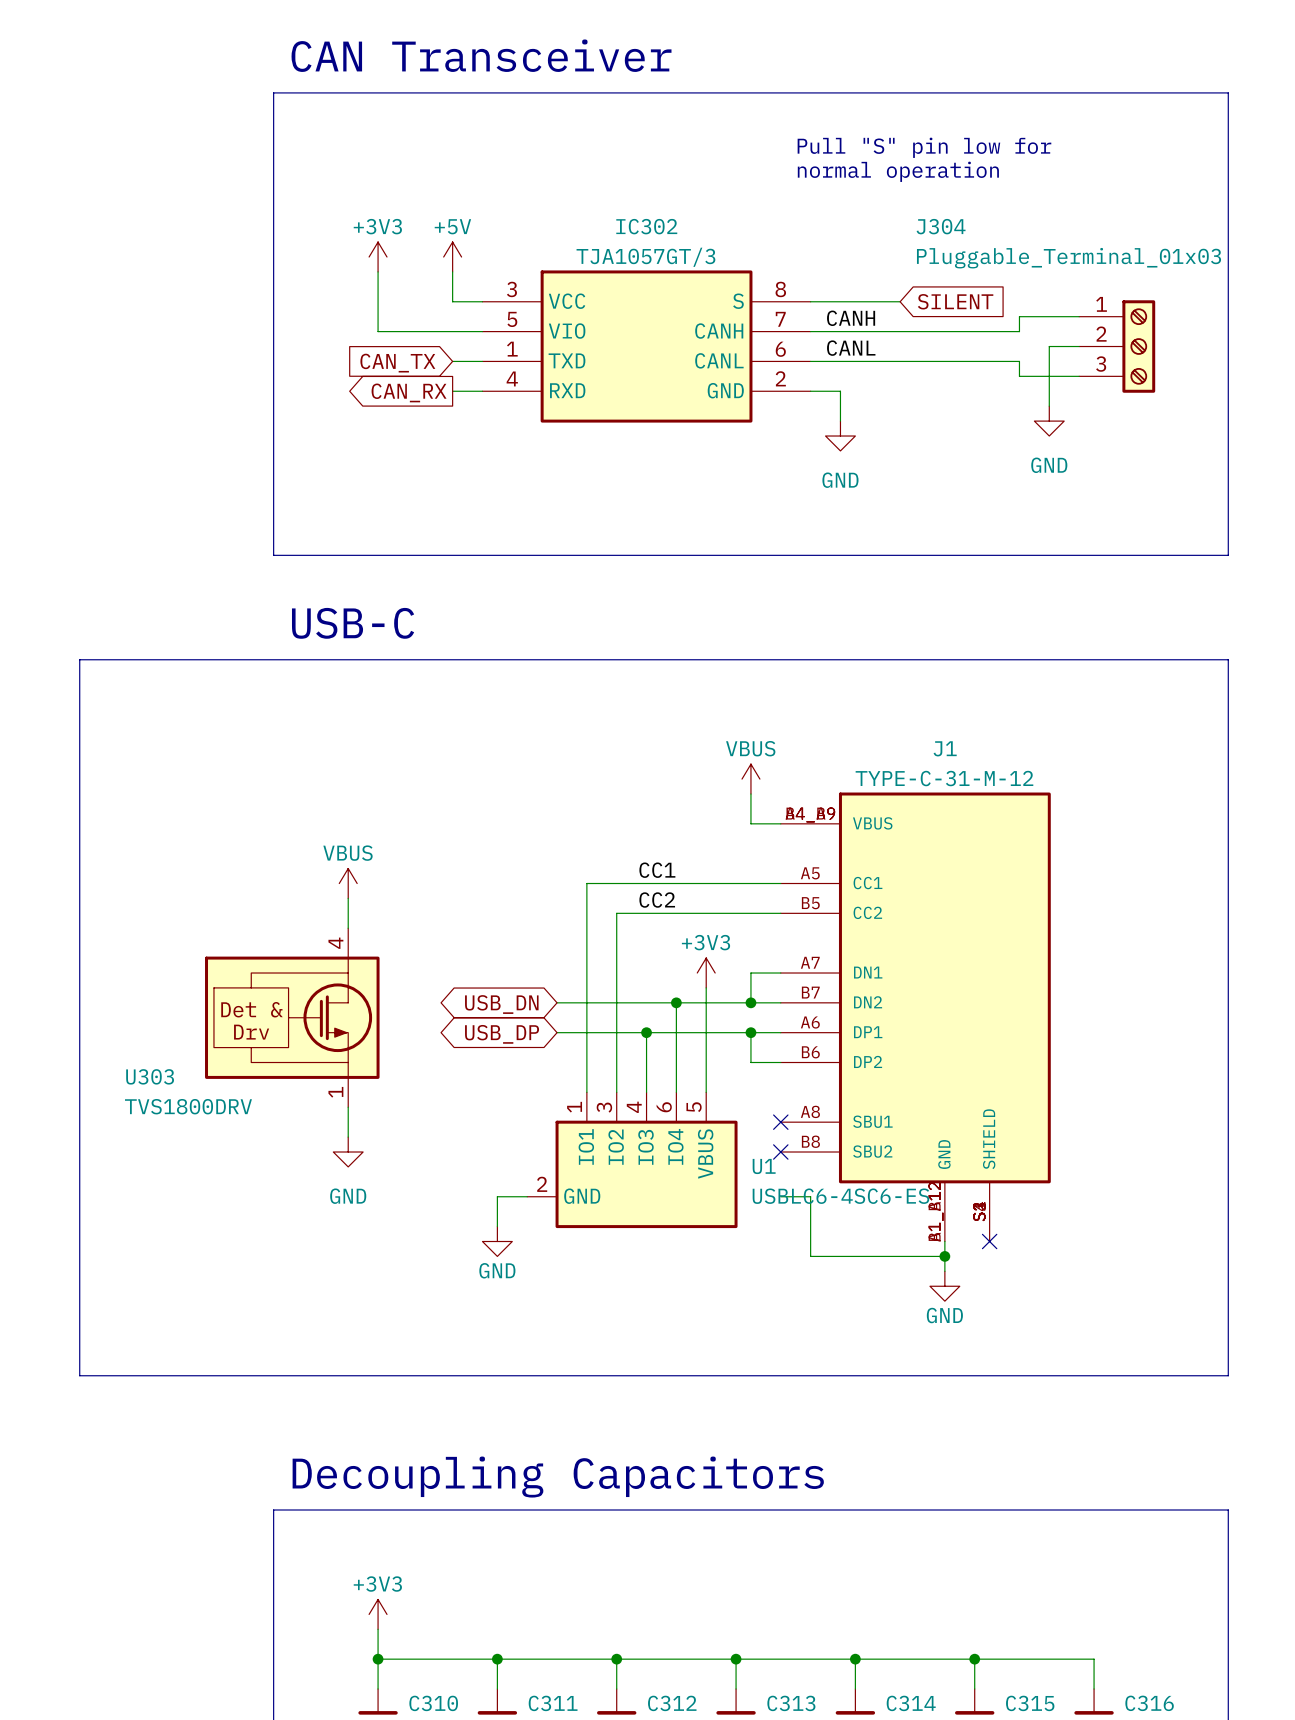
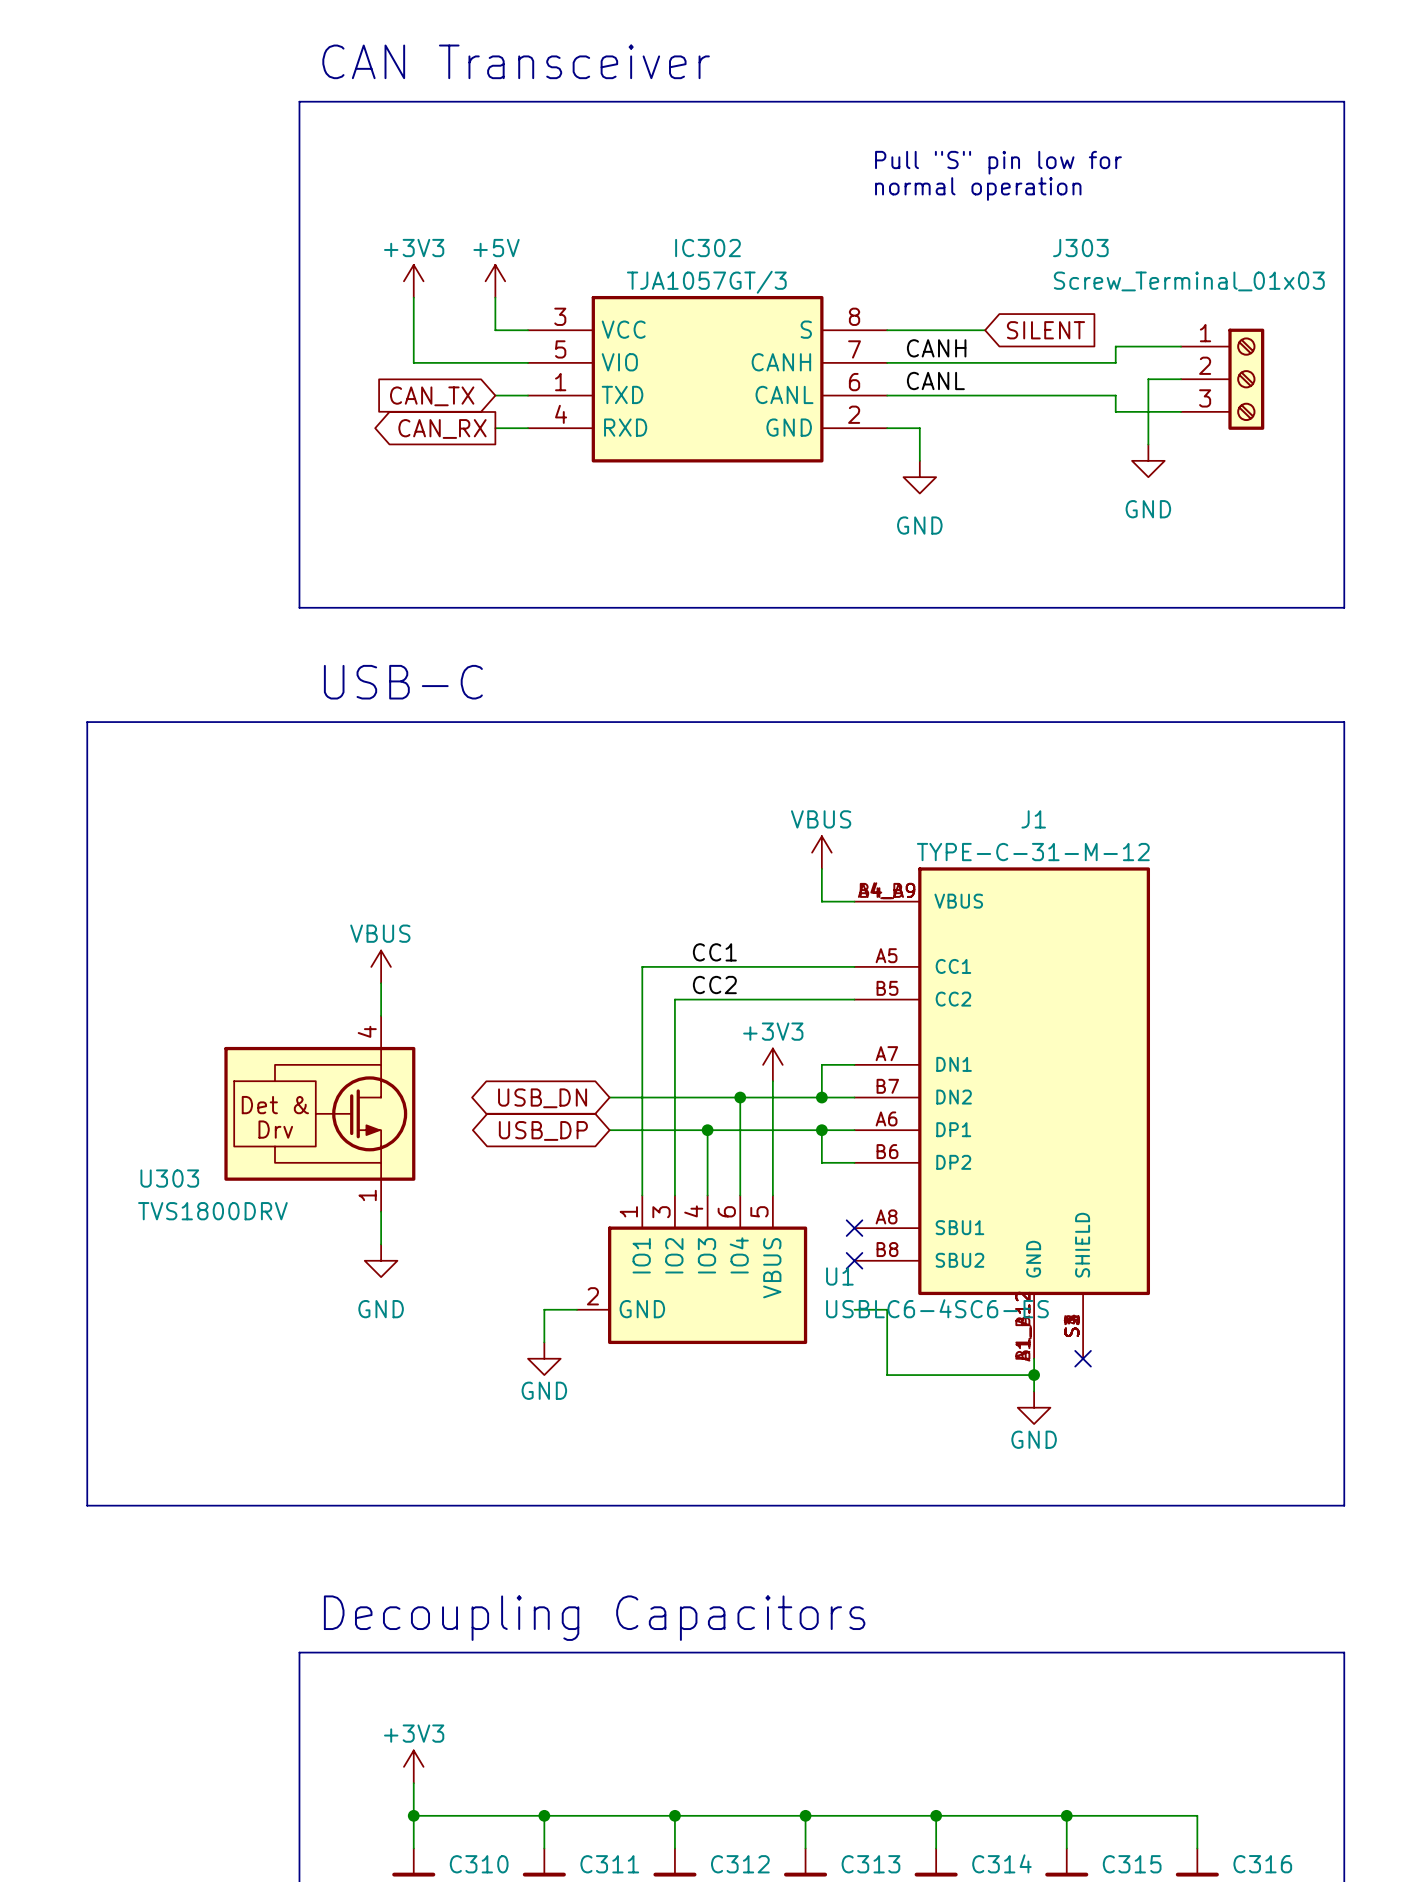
J304 name: J304 (941, 226) -> J303 (1080, 248)
J304 value: Pluggable_Terminal_01x03 (1069, 258) -> Screw_Terminal_01x03 (1189, 281)

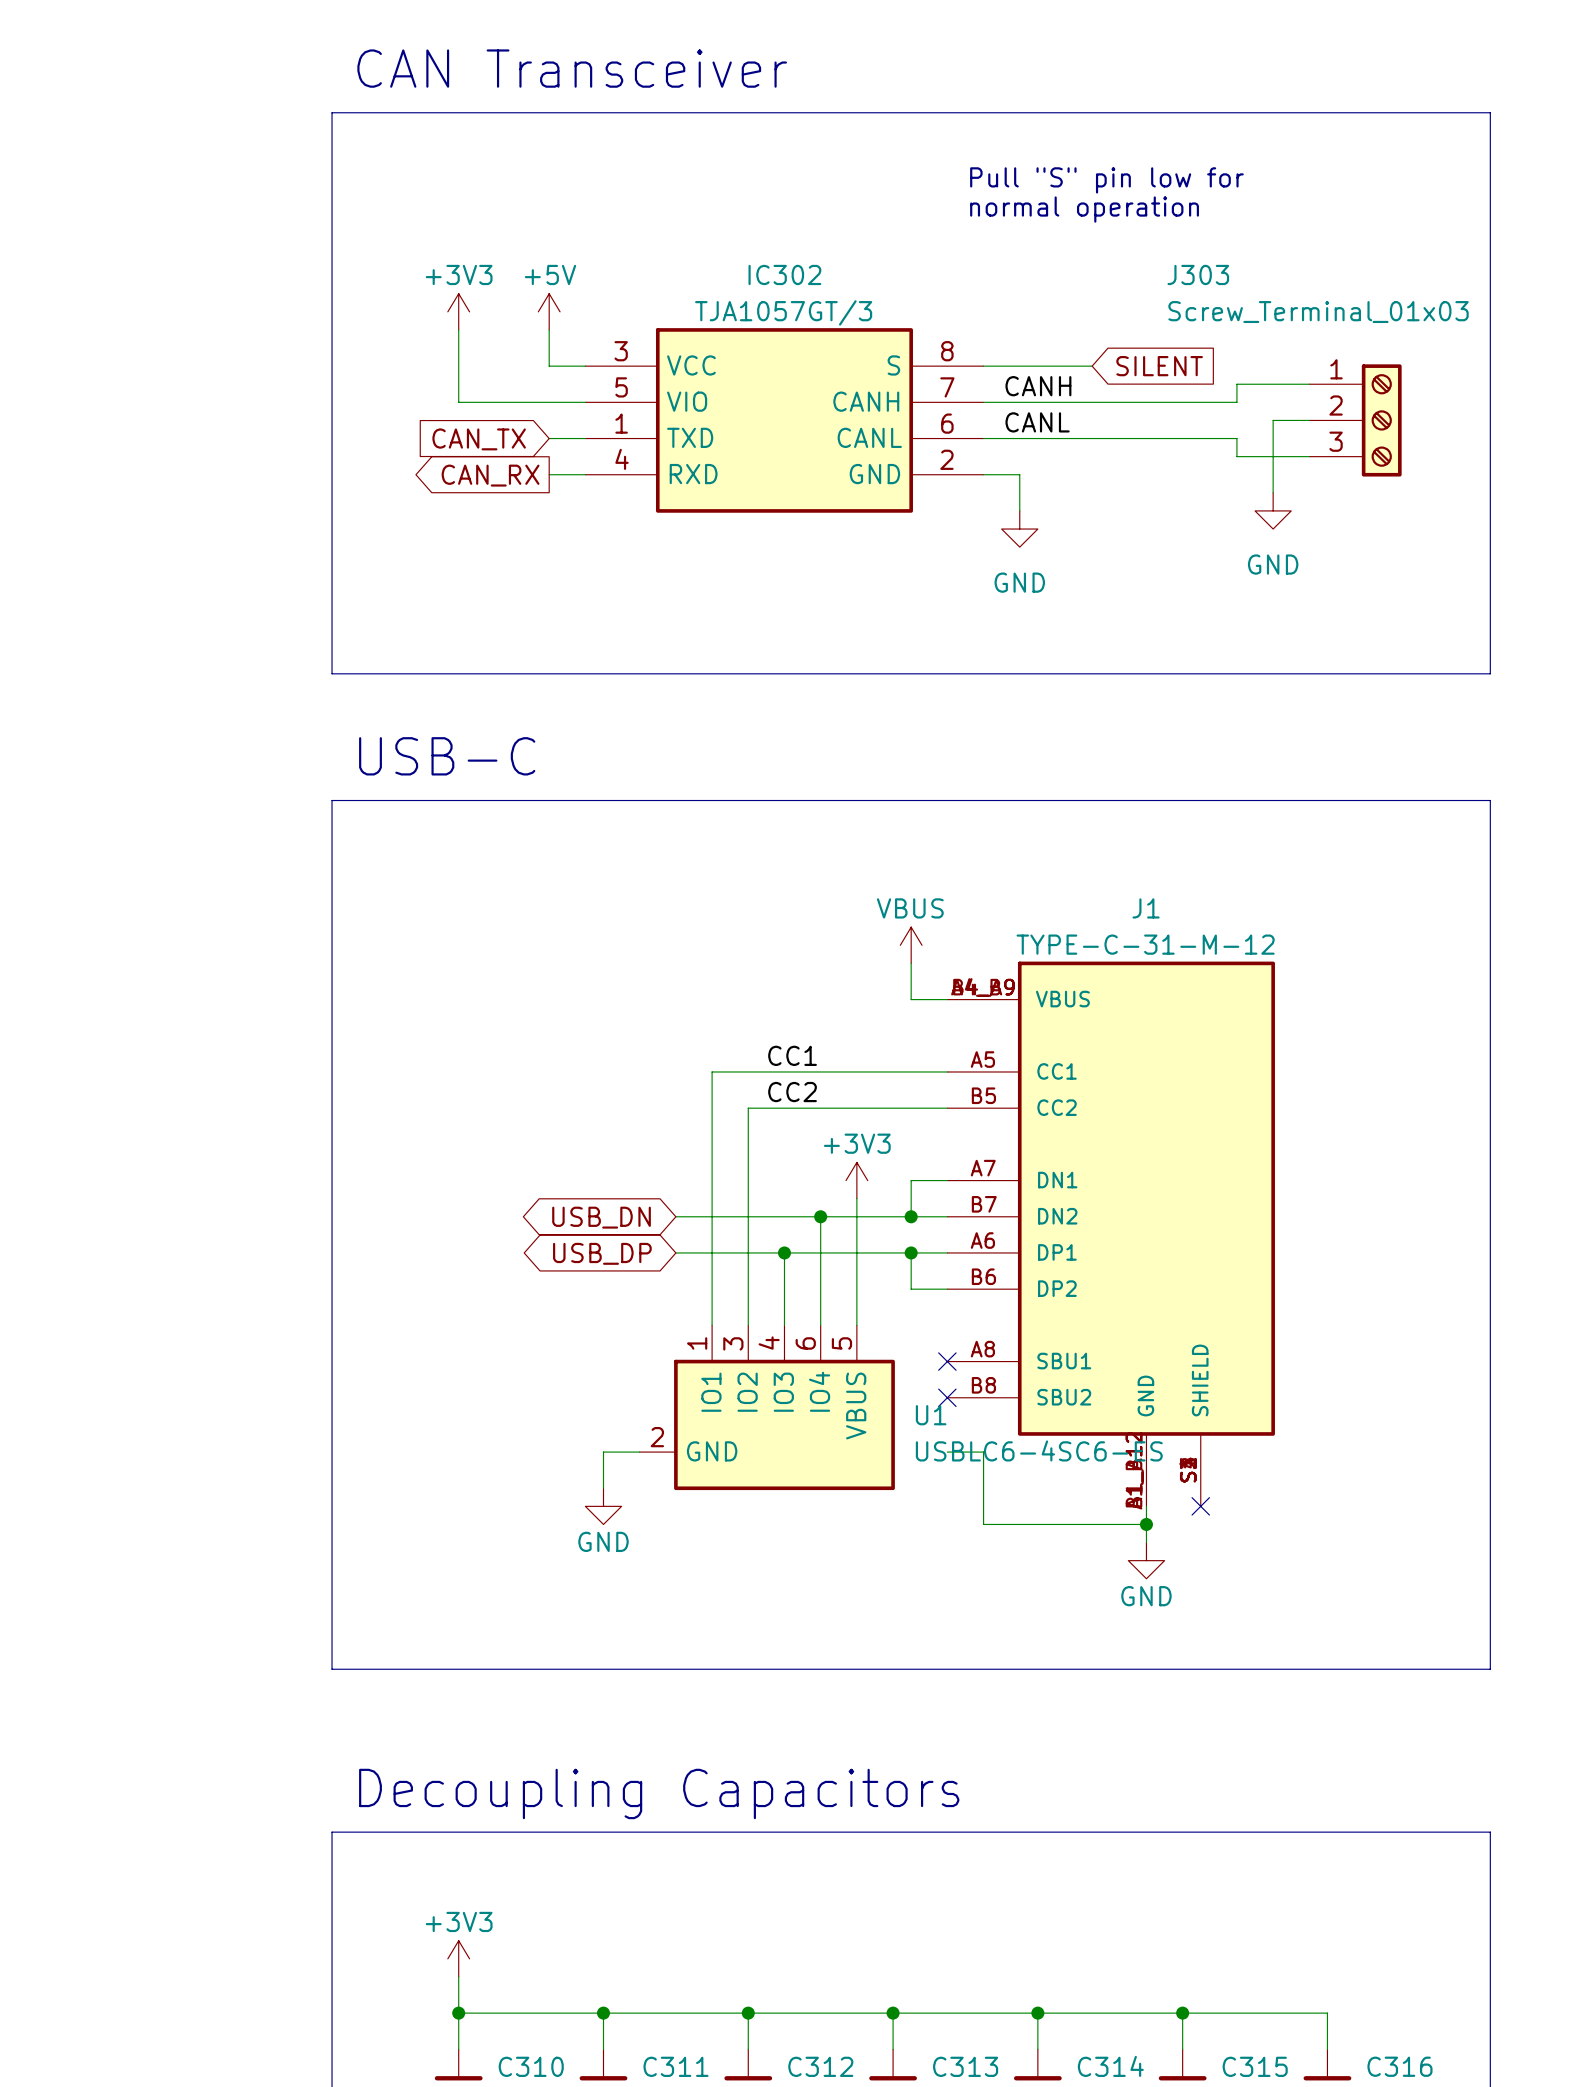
line: (299, 722) (87, 722) (87, 1505) (299, 1505) -> (332, 800) (332, 1669)
power symbol: VBUS (381, 966) -> none
wire: (381, 983) (381, 1015) -> none
U303: TVS1800DRV (319, 1113) -> none
wire: (381, 1211) (381, 1244) -> none
power symbol: GND (381, 1260) -> none

